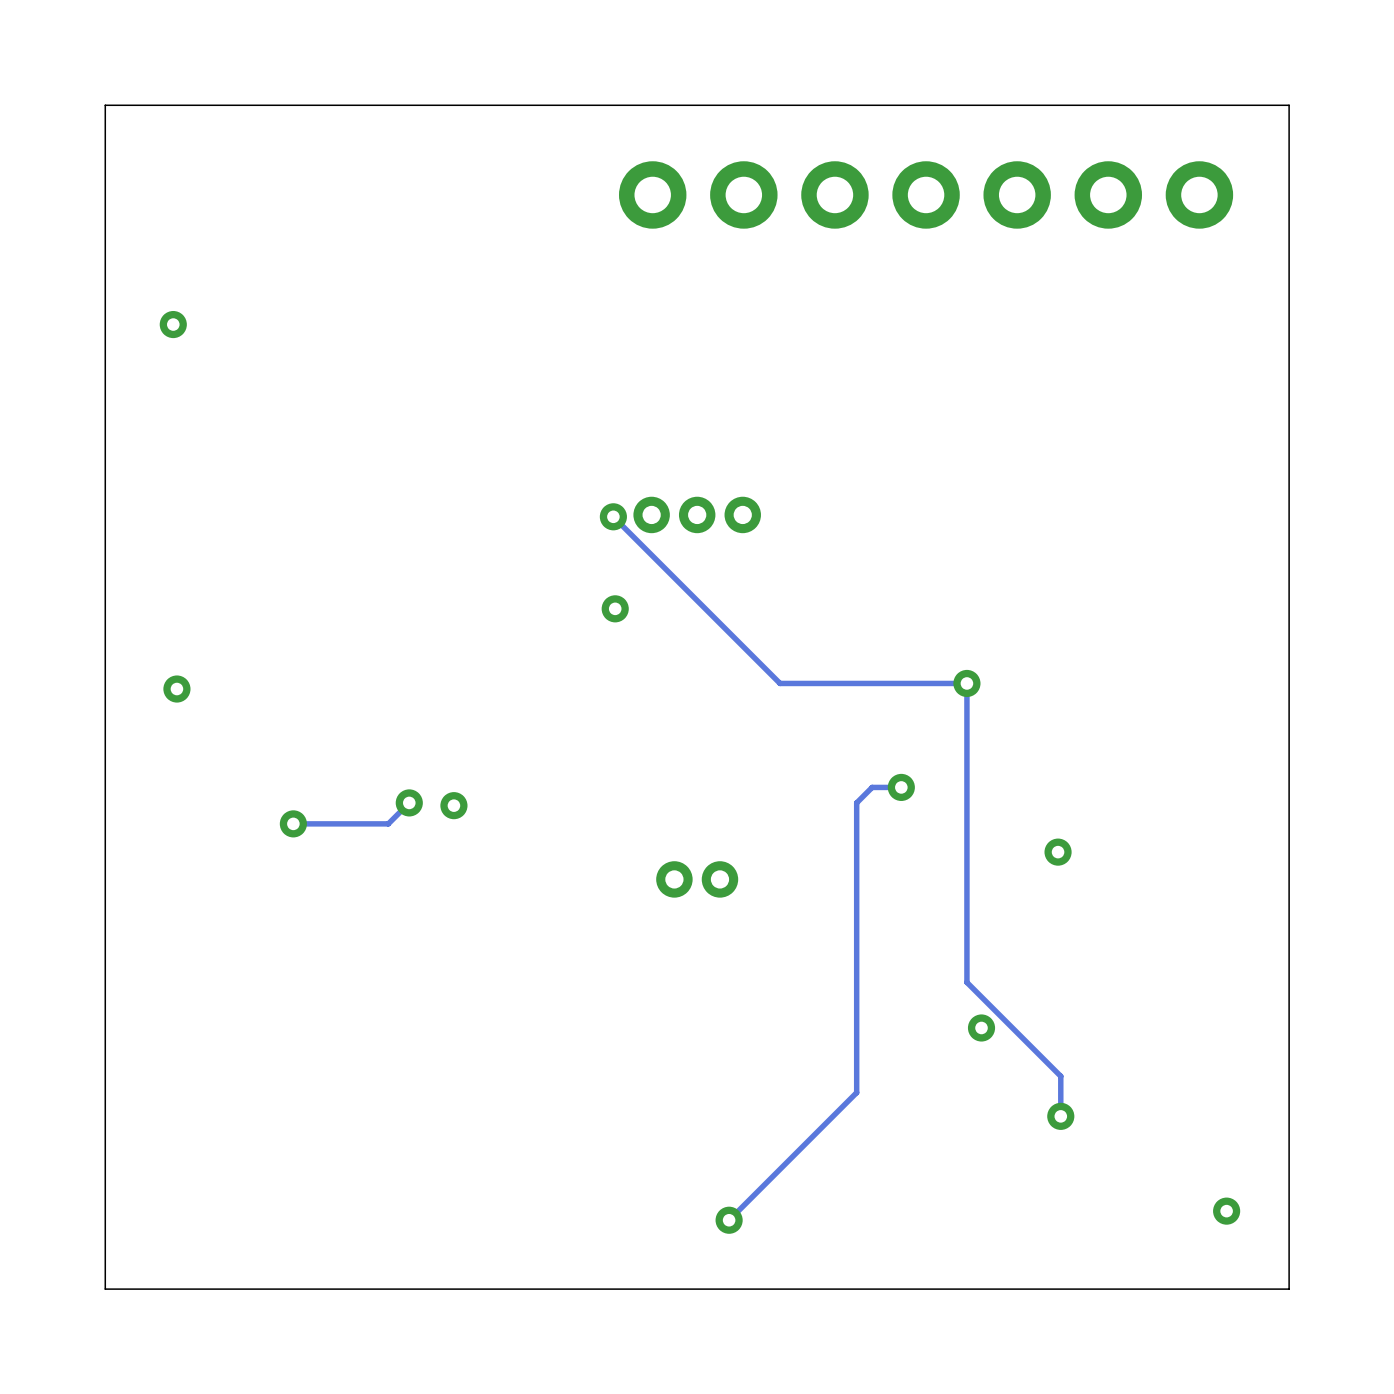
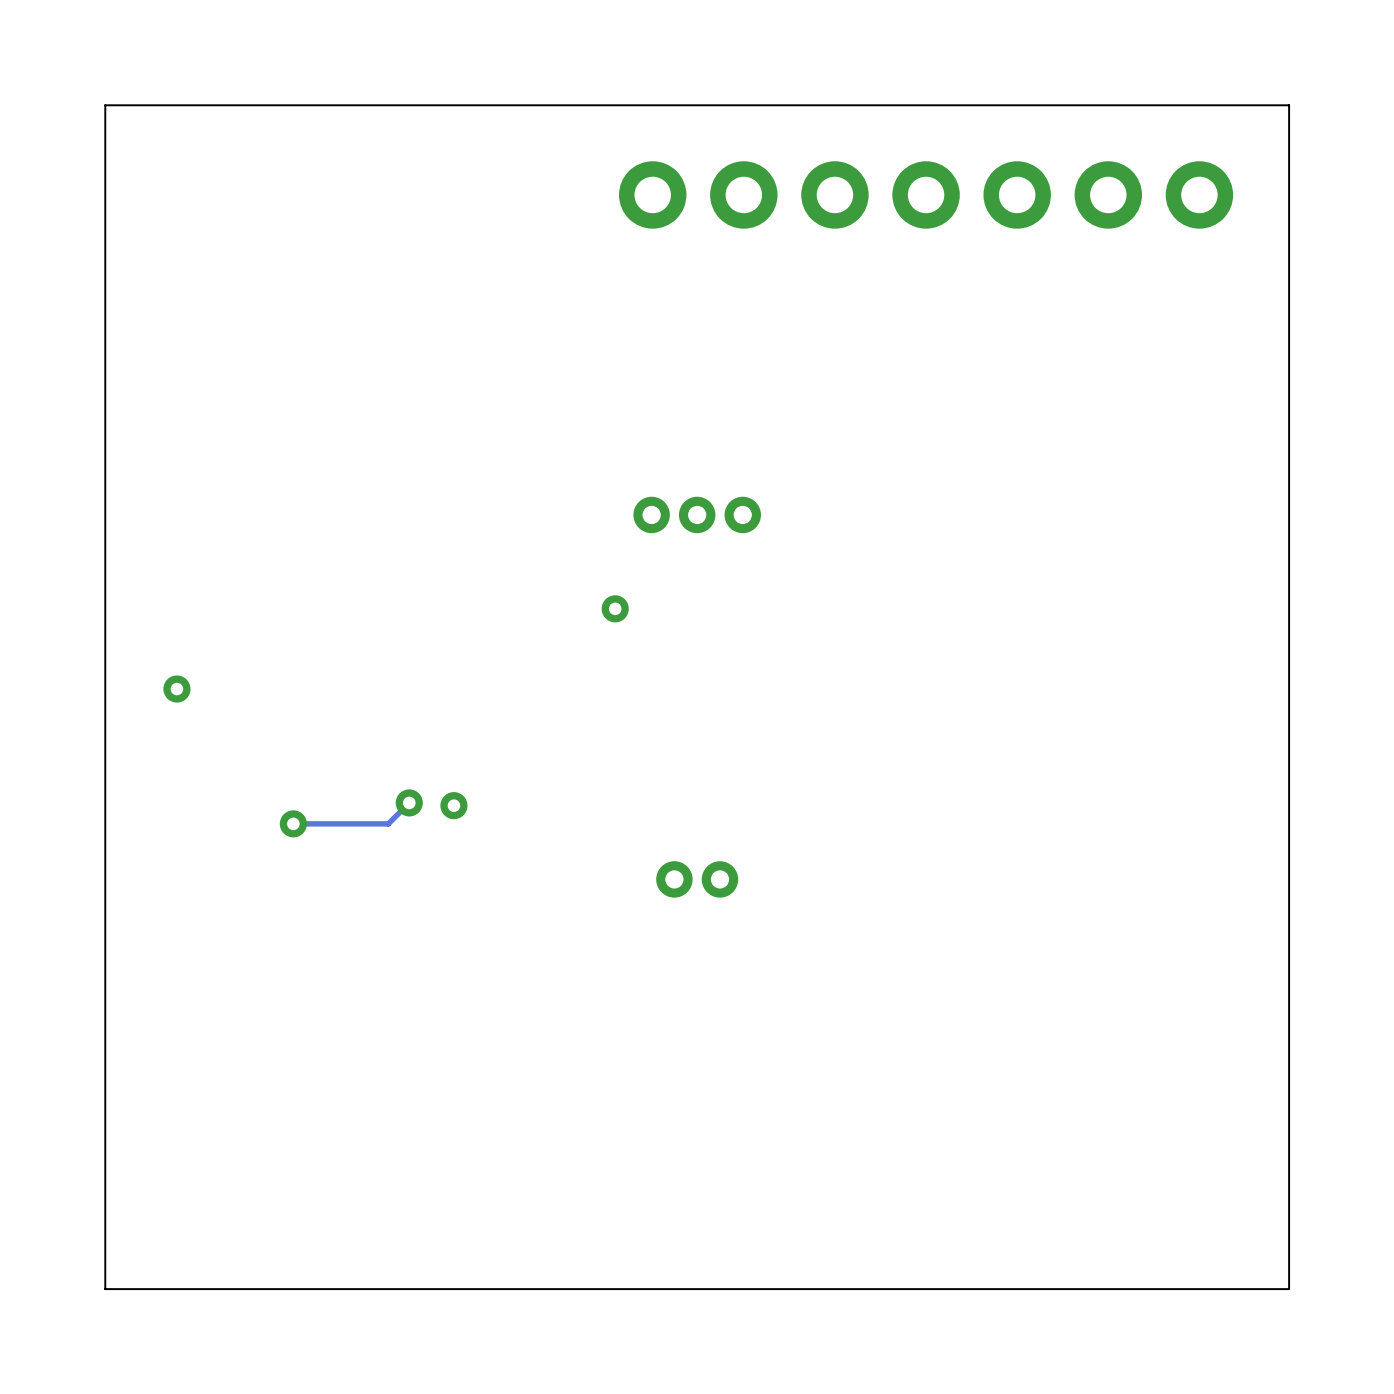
via: (173, 324) -> none
track: (613, 516) (780, 683) (966, 683) (966, 982) (1060, 1076) (1060, 1116) -> none
via: (613, 516) -> none
via: (966, 683) -> none
track: (901, 787) (872, 787) (856, 802) (856, 1092) (729, 1220) -> none
via: (901, 787) -> none
via: (1058, 852) -> none
via: (981, 1027) -> none
via: (1060, 1116) -> none
via: (1226, 1211) -> none
via: (729, 1220) -> none

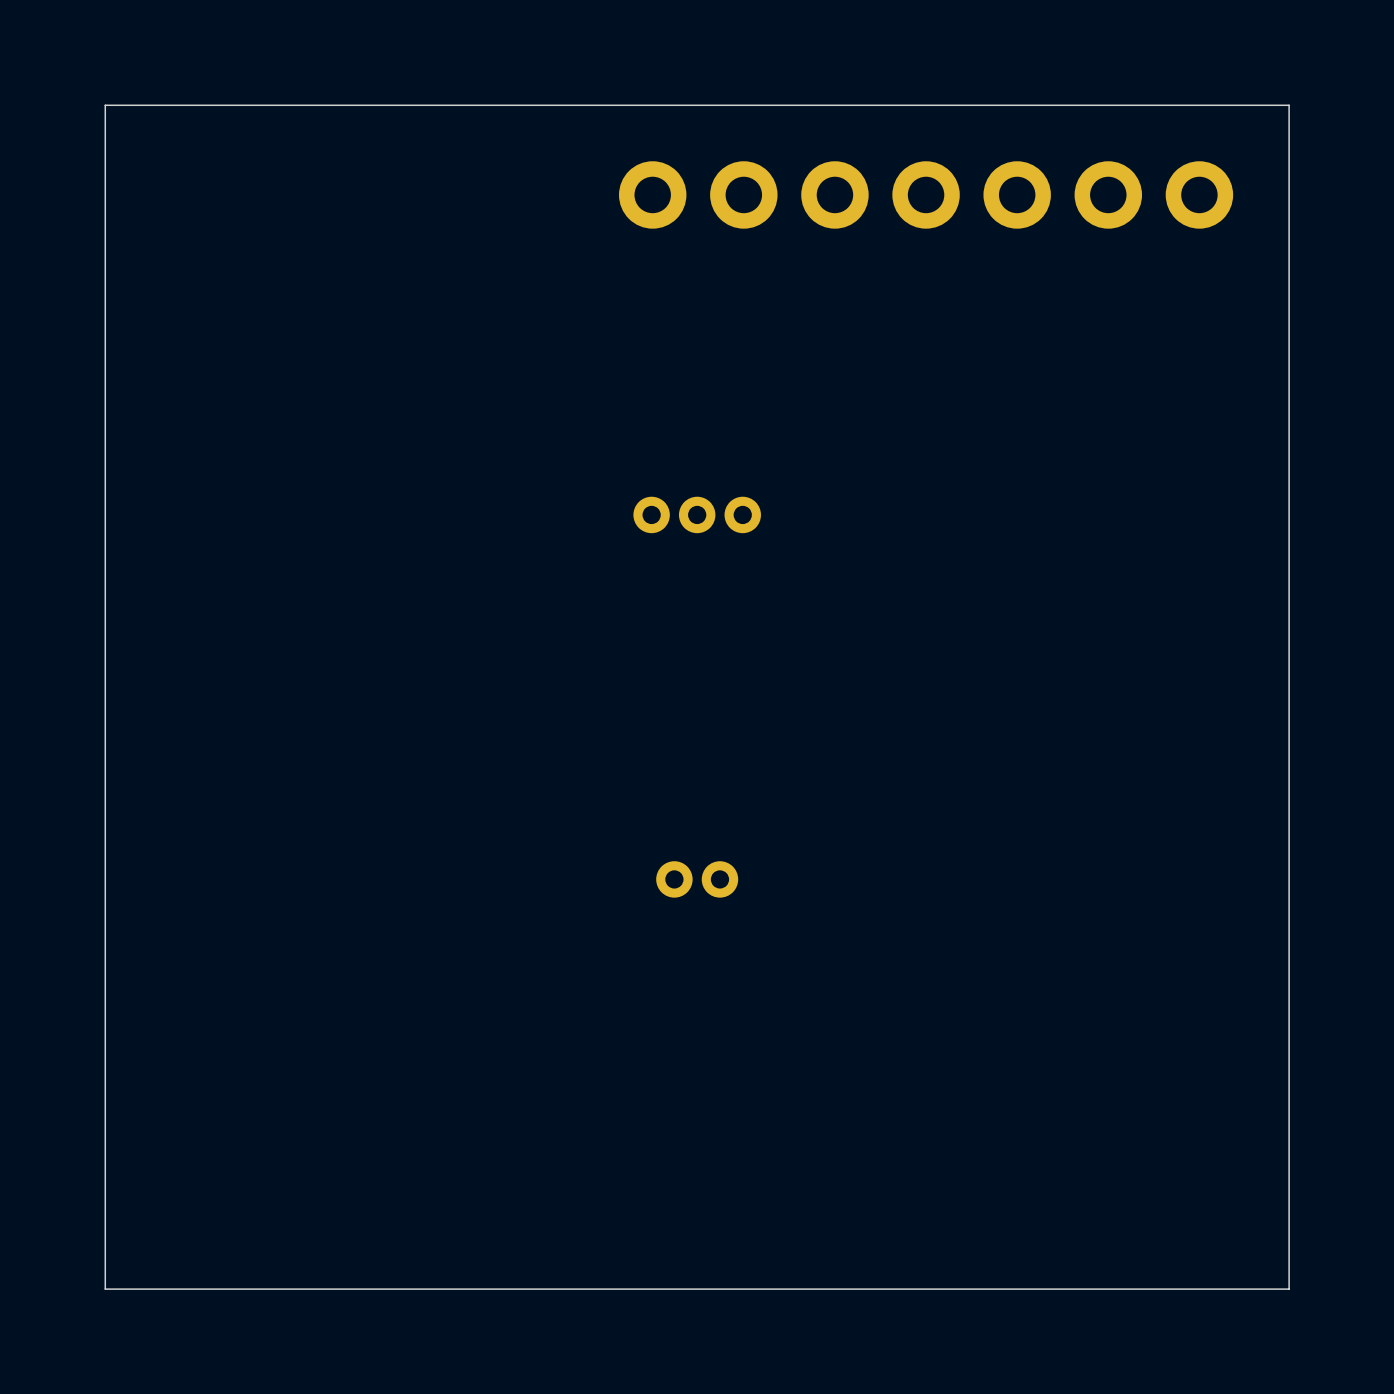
via: (615, 608) -> none
via: (176, 689) -> none
track: (409, 802) (388, 823) (293, 823) -> none
via: (409, 802) -> none
via: (453, 805) -> none
via: (293, 823) -> none

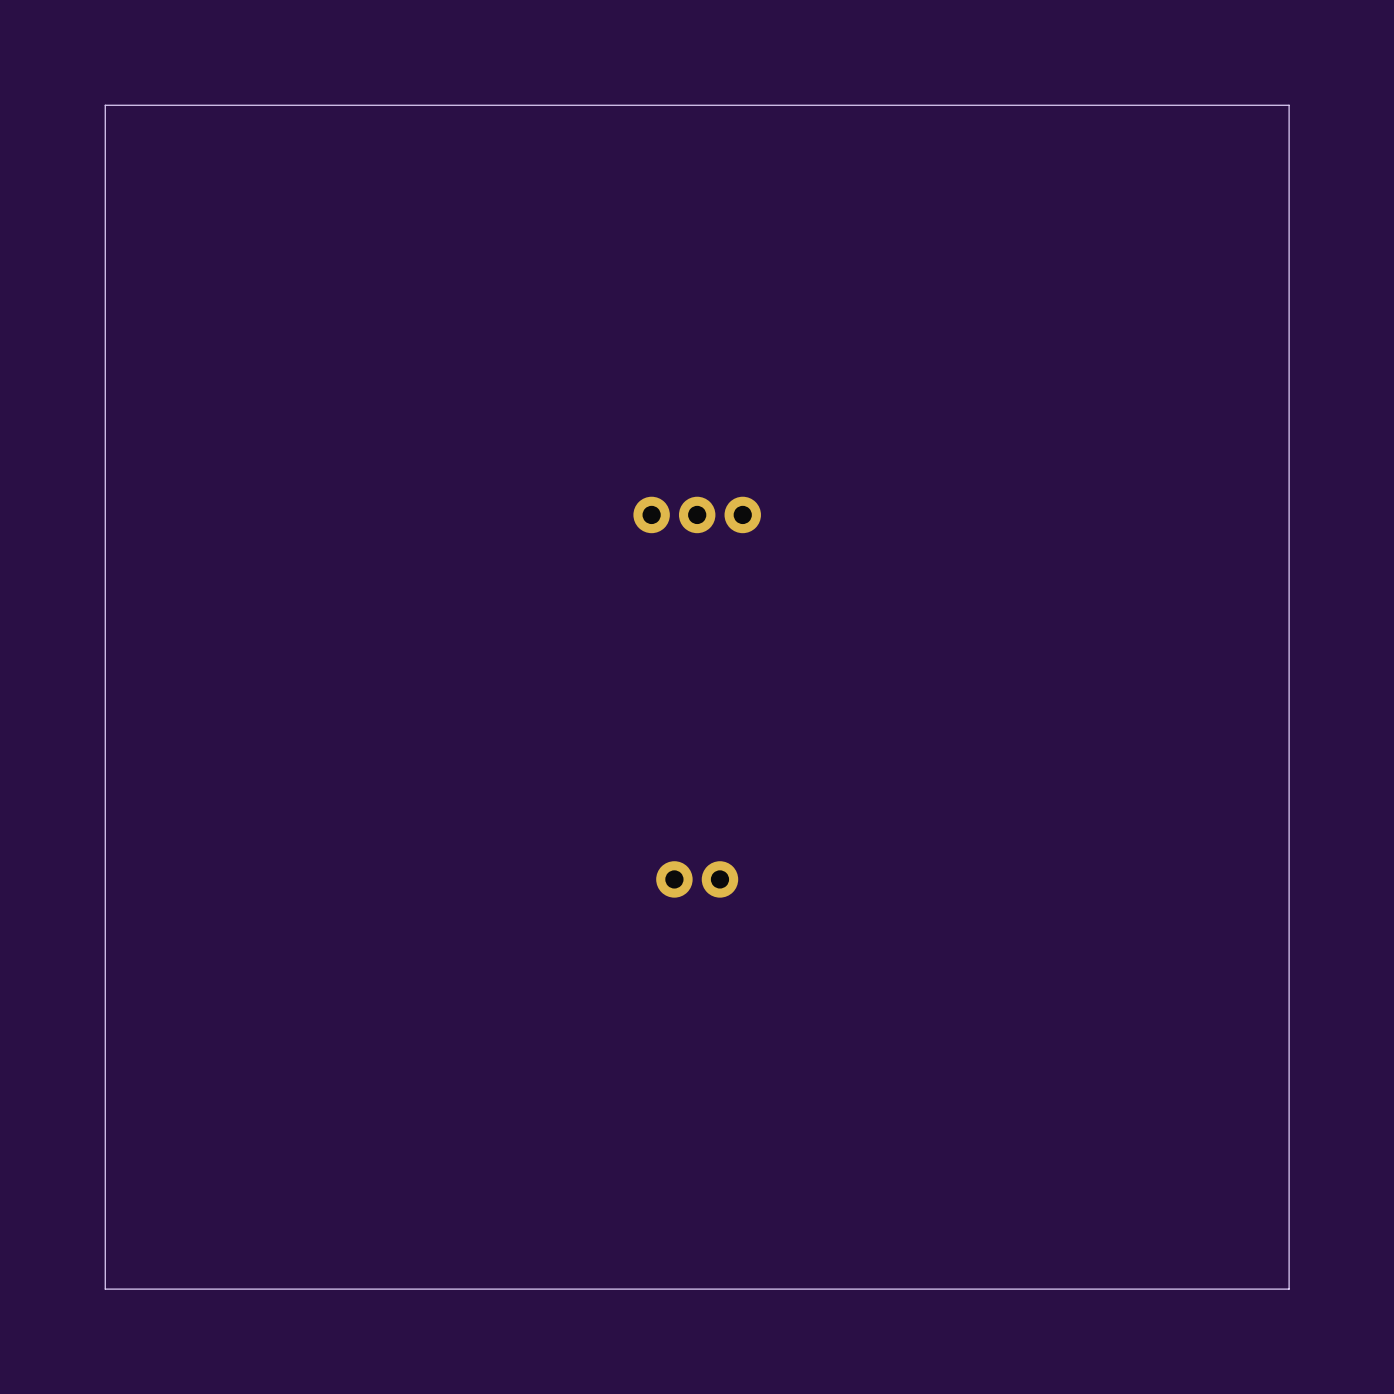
part: (926, 194) -> none

